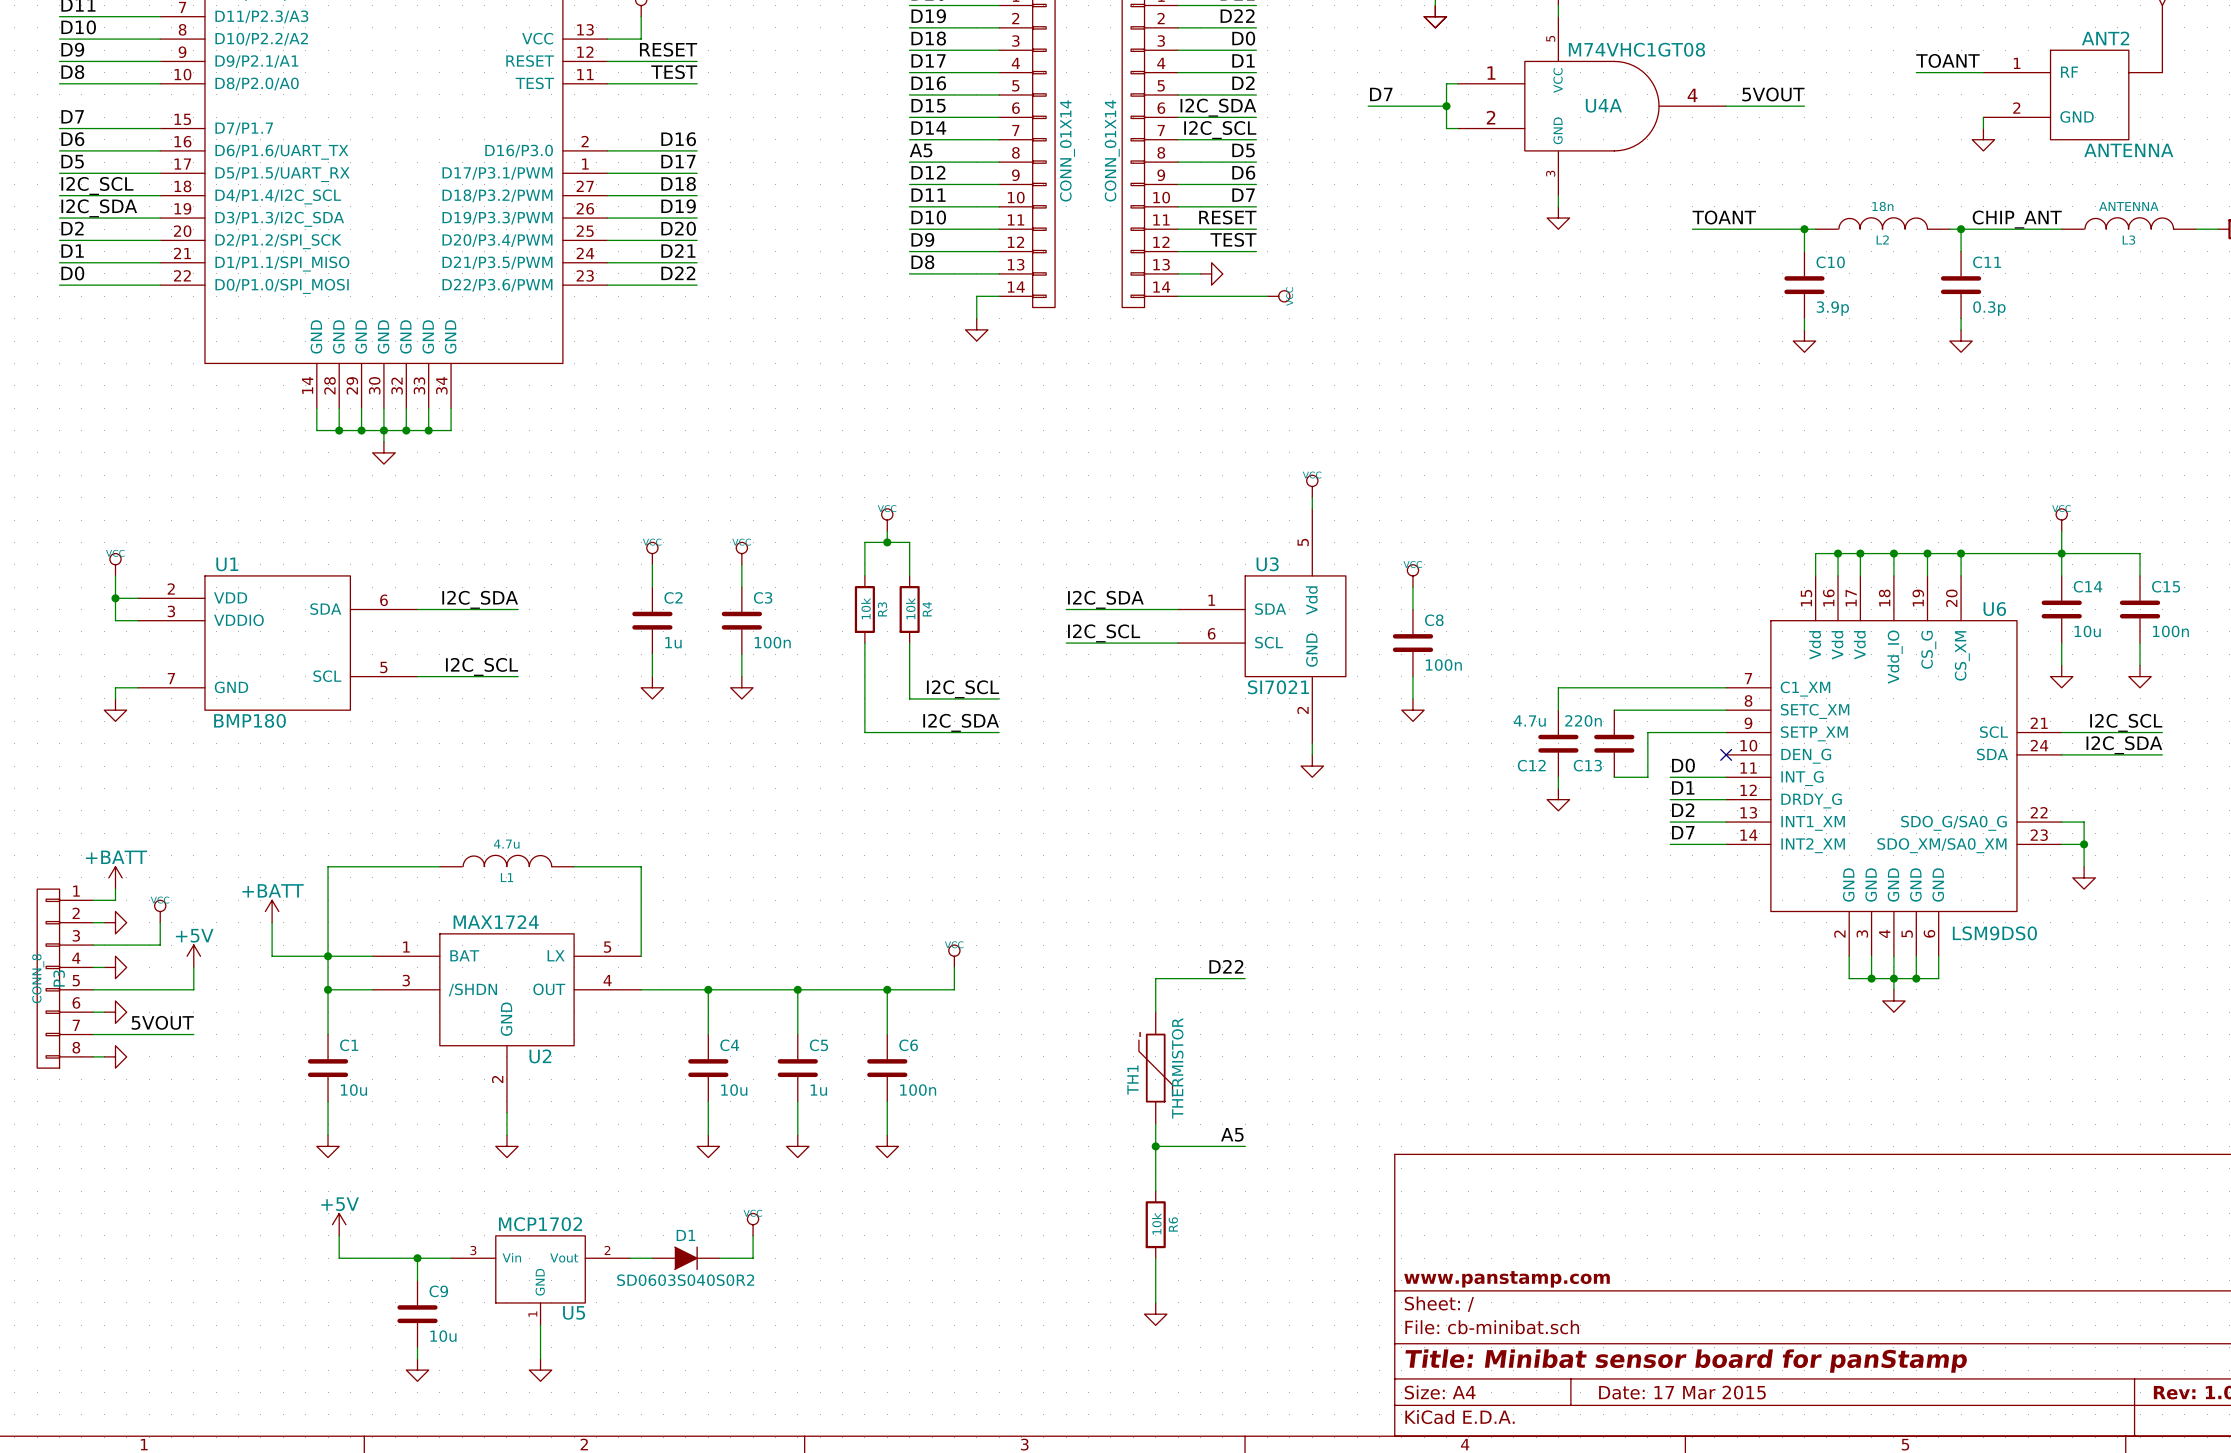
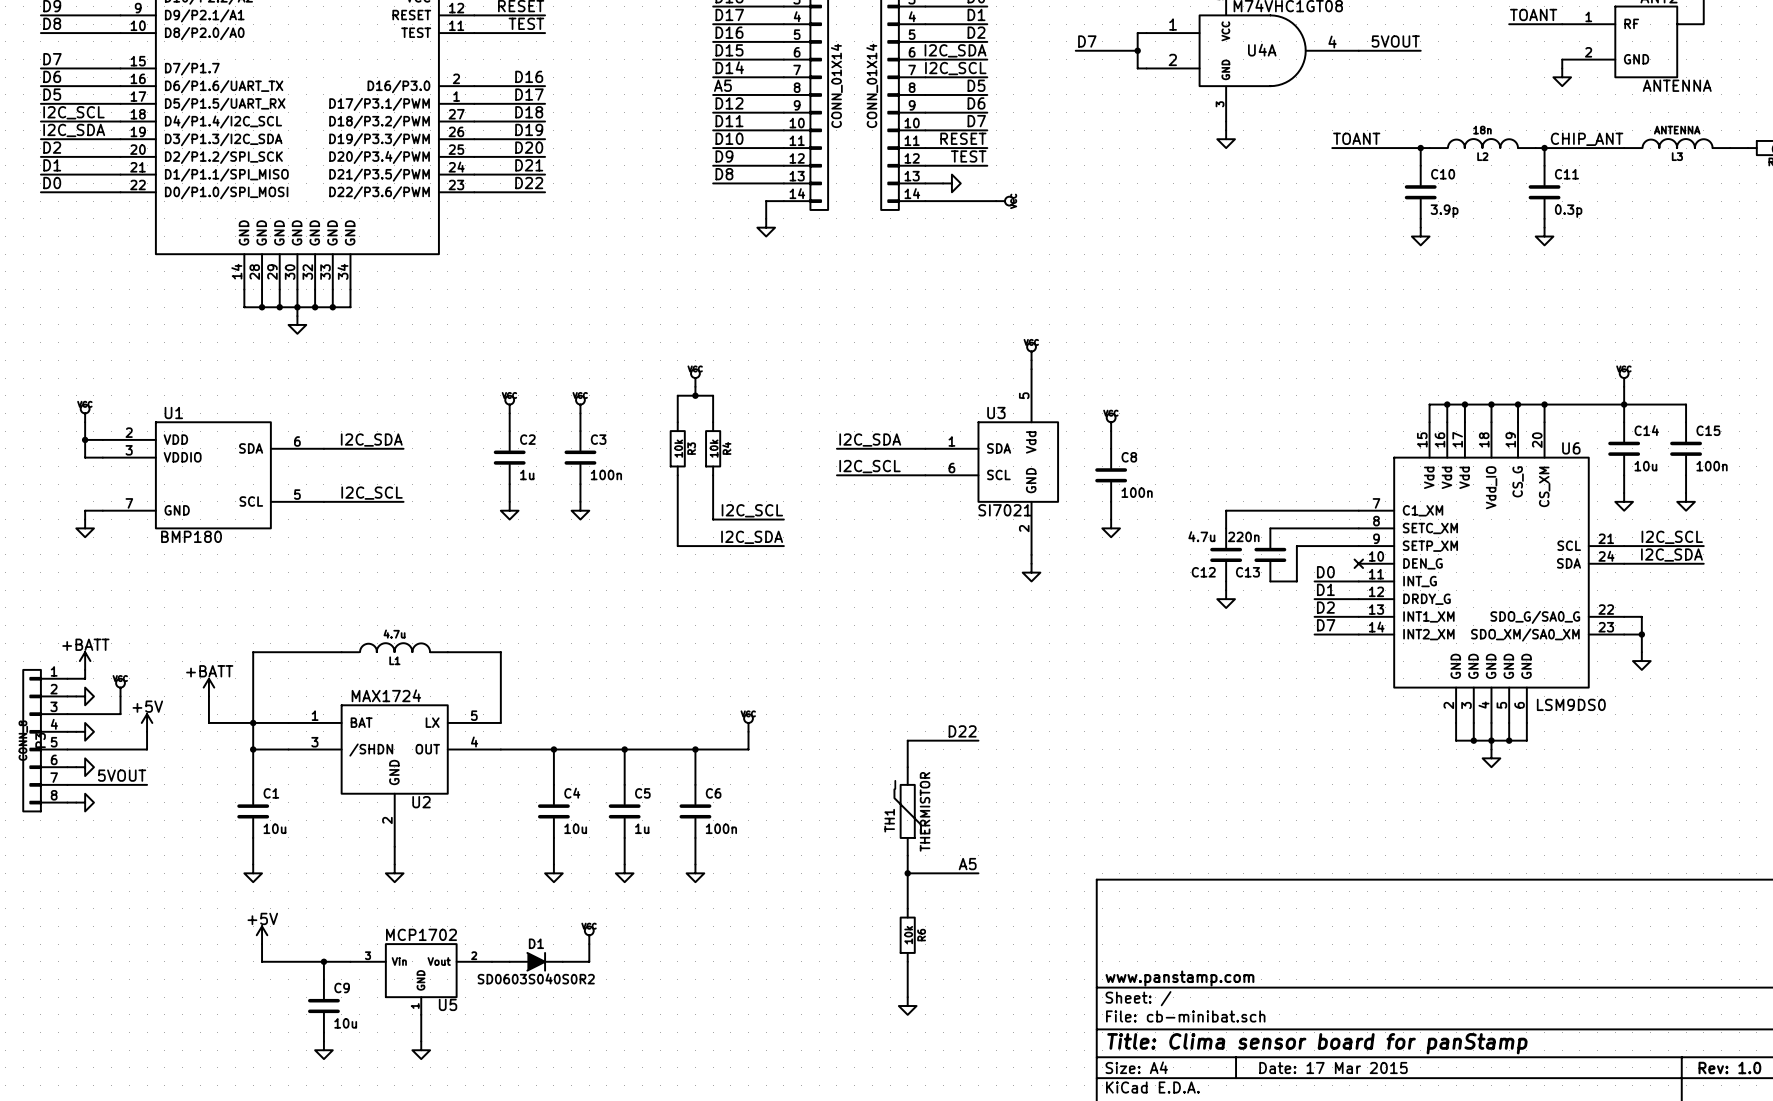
title block: Title: Minibat sensor board for panStamp (1686, 1361) -> Title: Clima sensor board for panStamp (1317, 1043)

